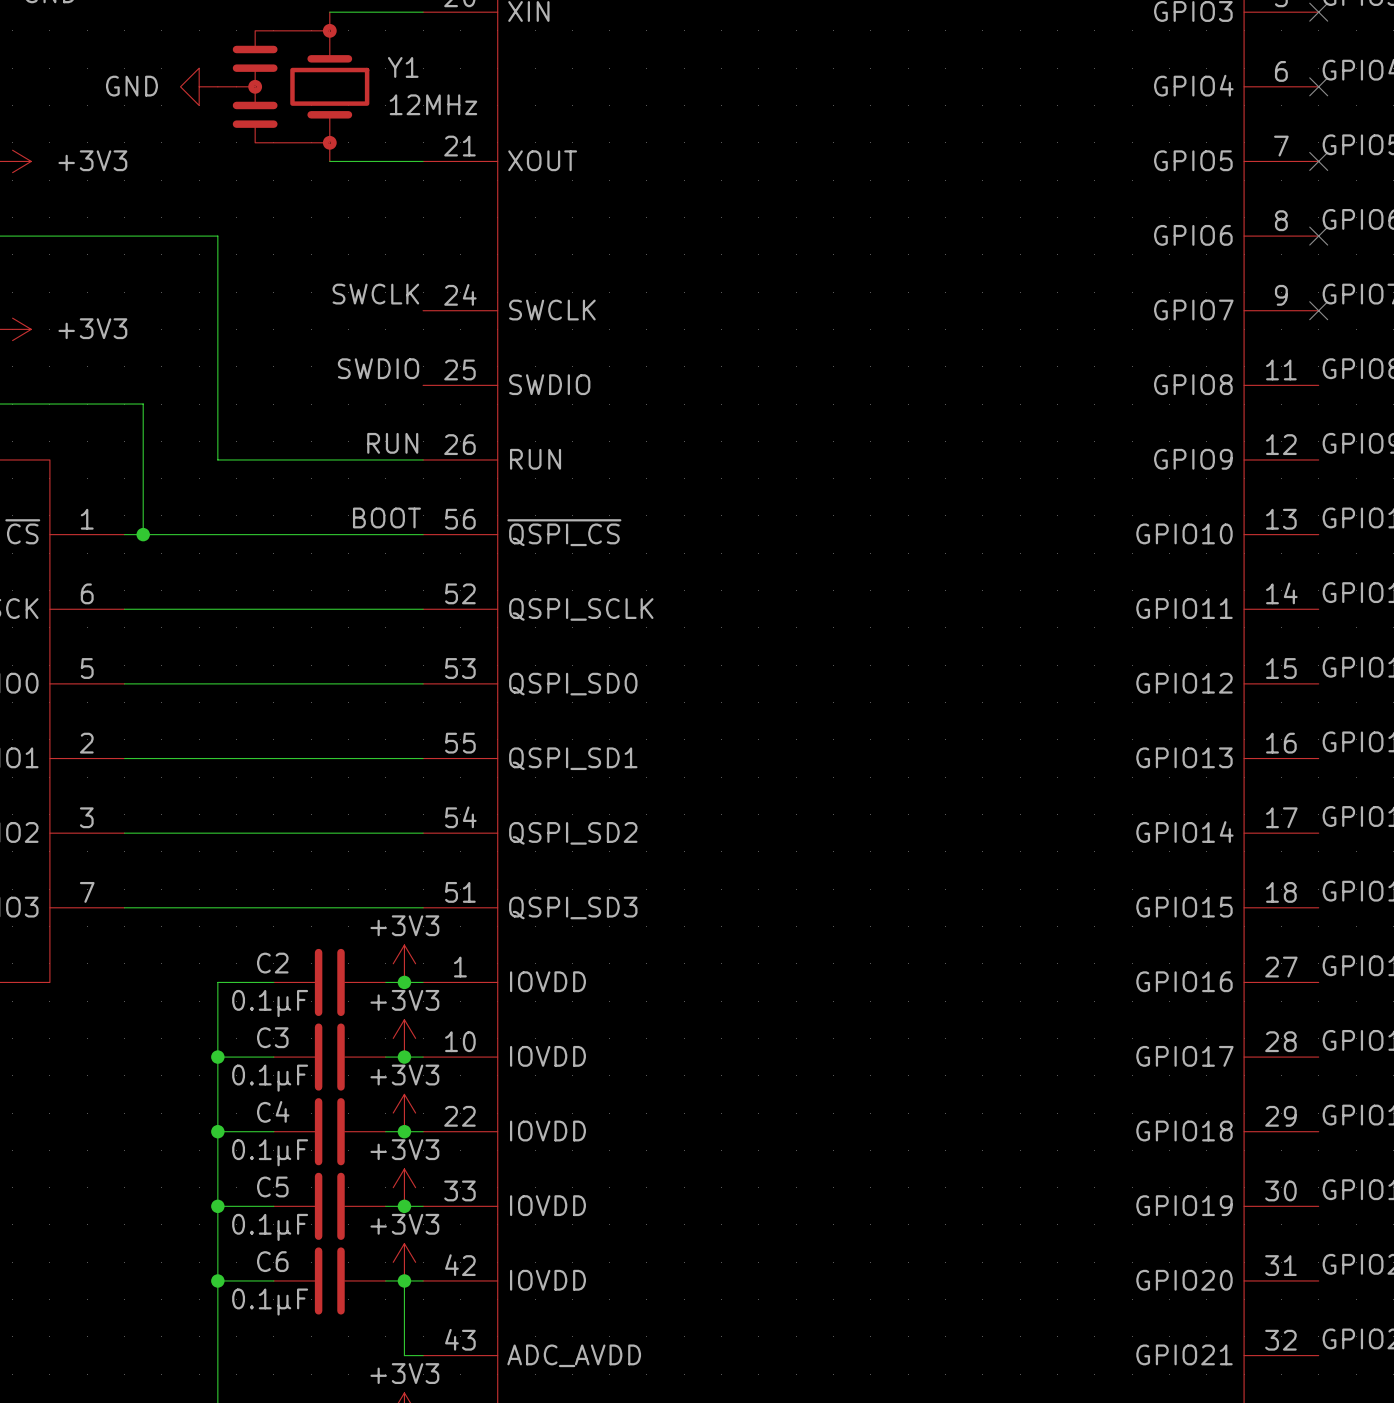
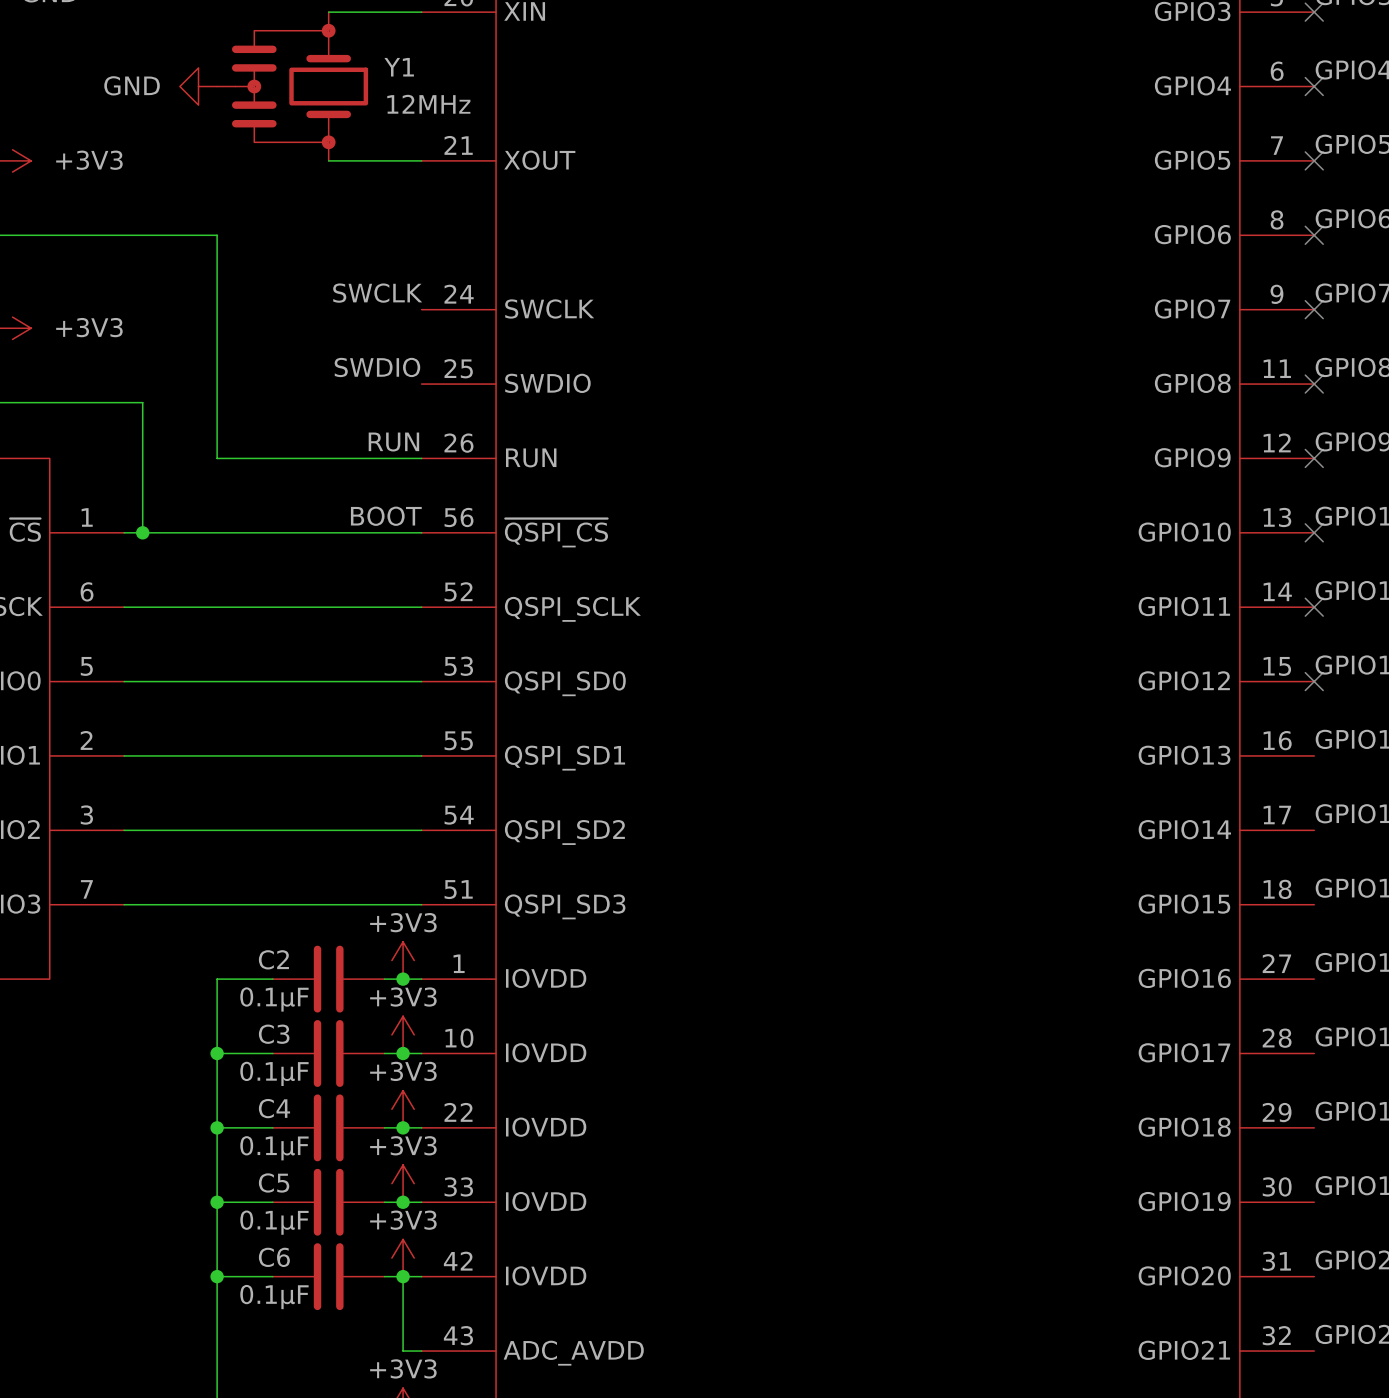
no-connect mark: none -> (1314, 384)
no-connect mark: none -> (1314, 458)
no-connect mark: none -> (1314, 532)
no-connect mark: none -> (1314, 607)
no-connect mark: none -> (1314, 681)

